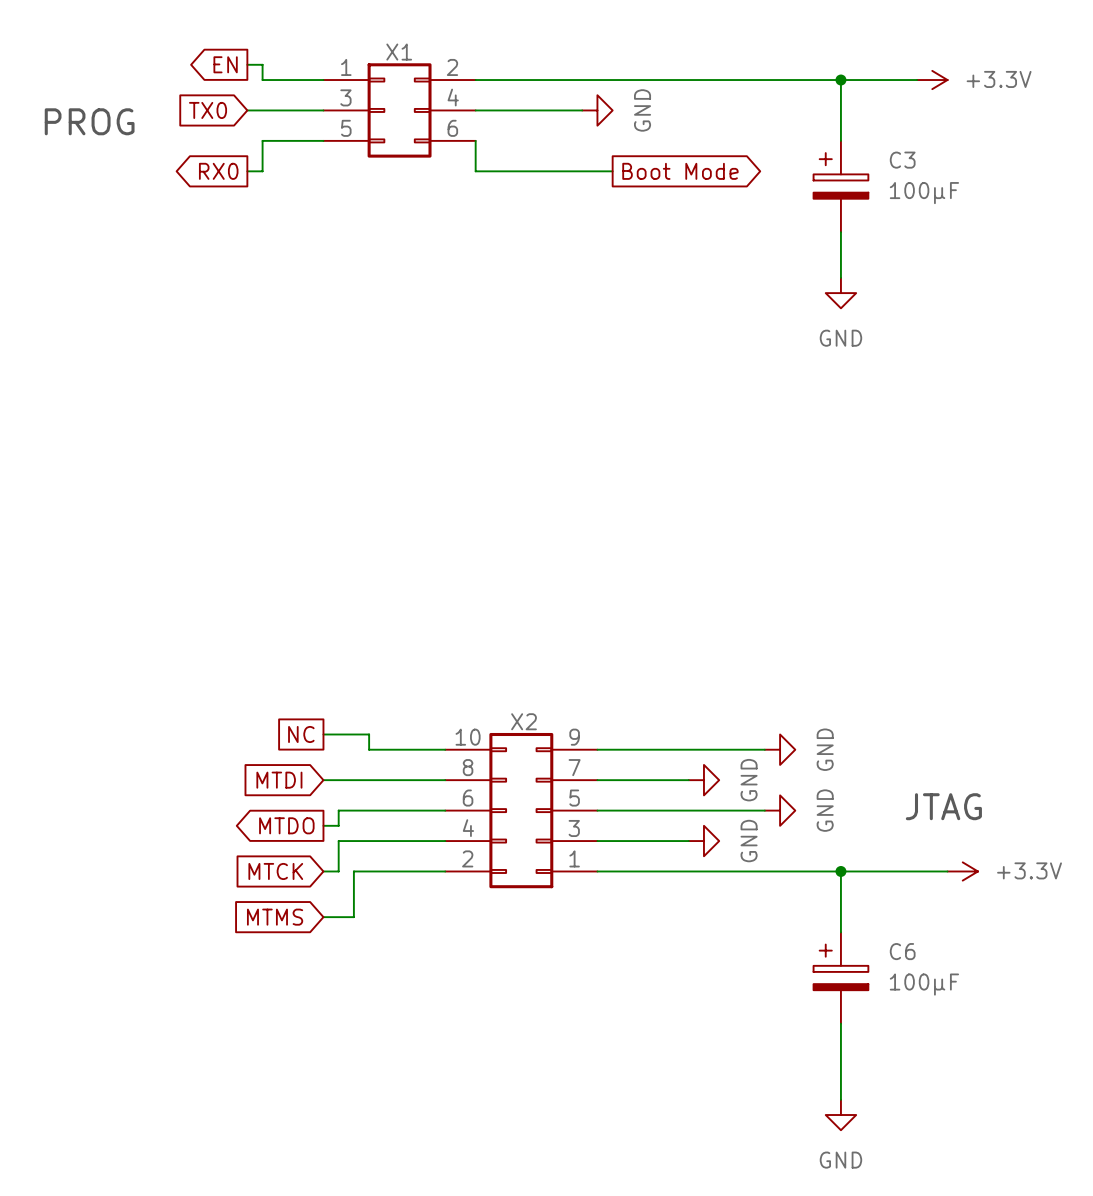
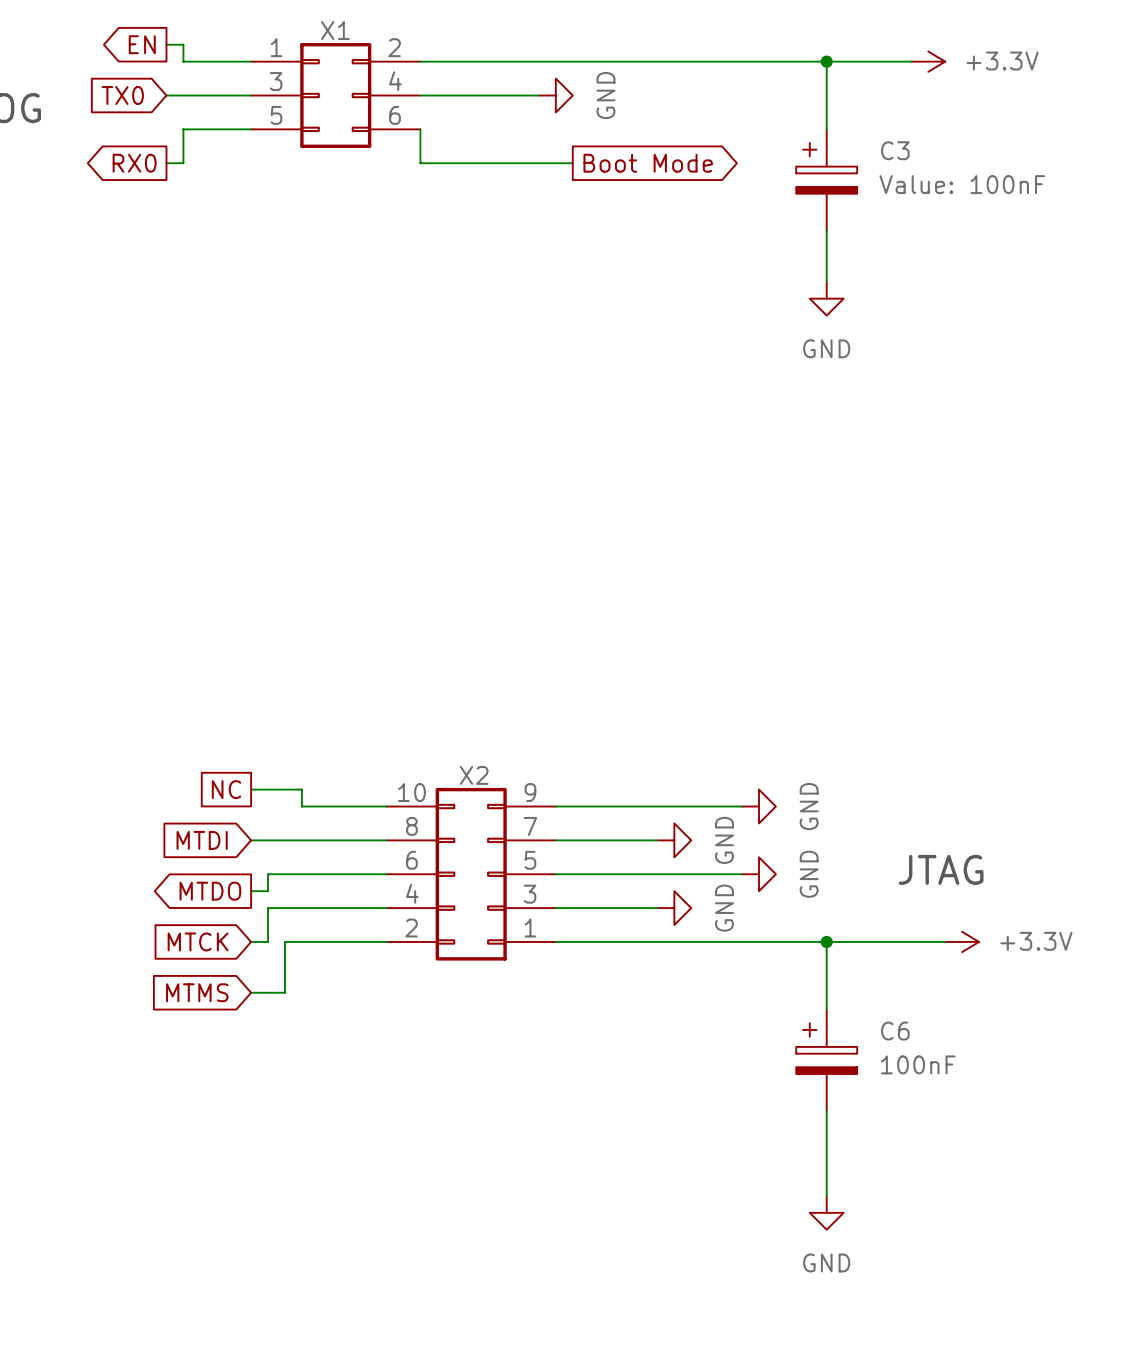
C3 value: 100µF (924, 193) -> Value: 100nF (962, 184)
C6 value: 100µF (924, 984) -> 100nF (918, 1064)

